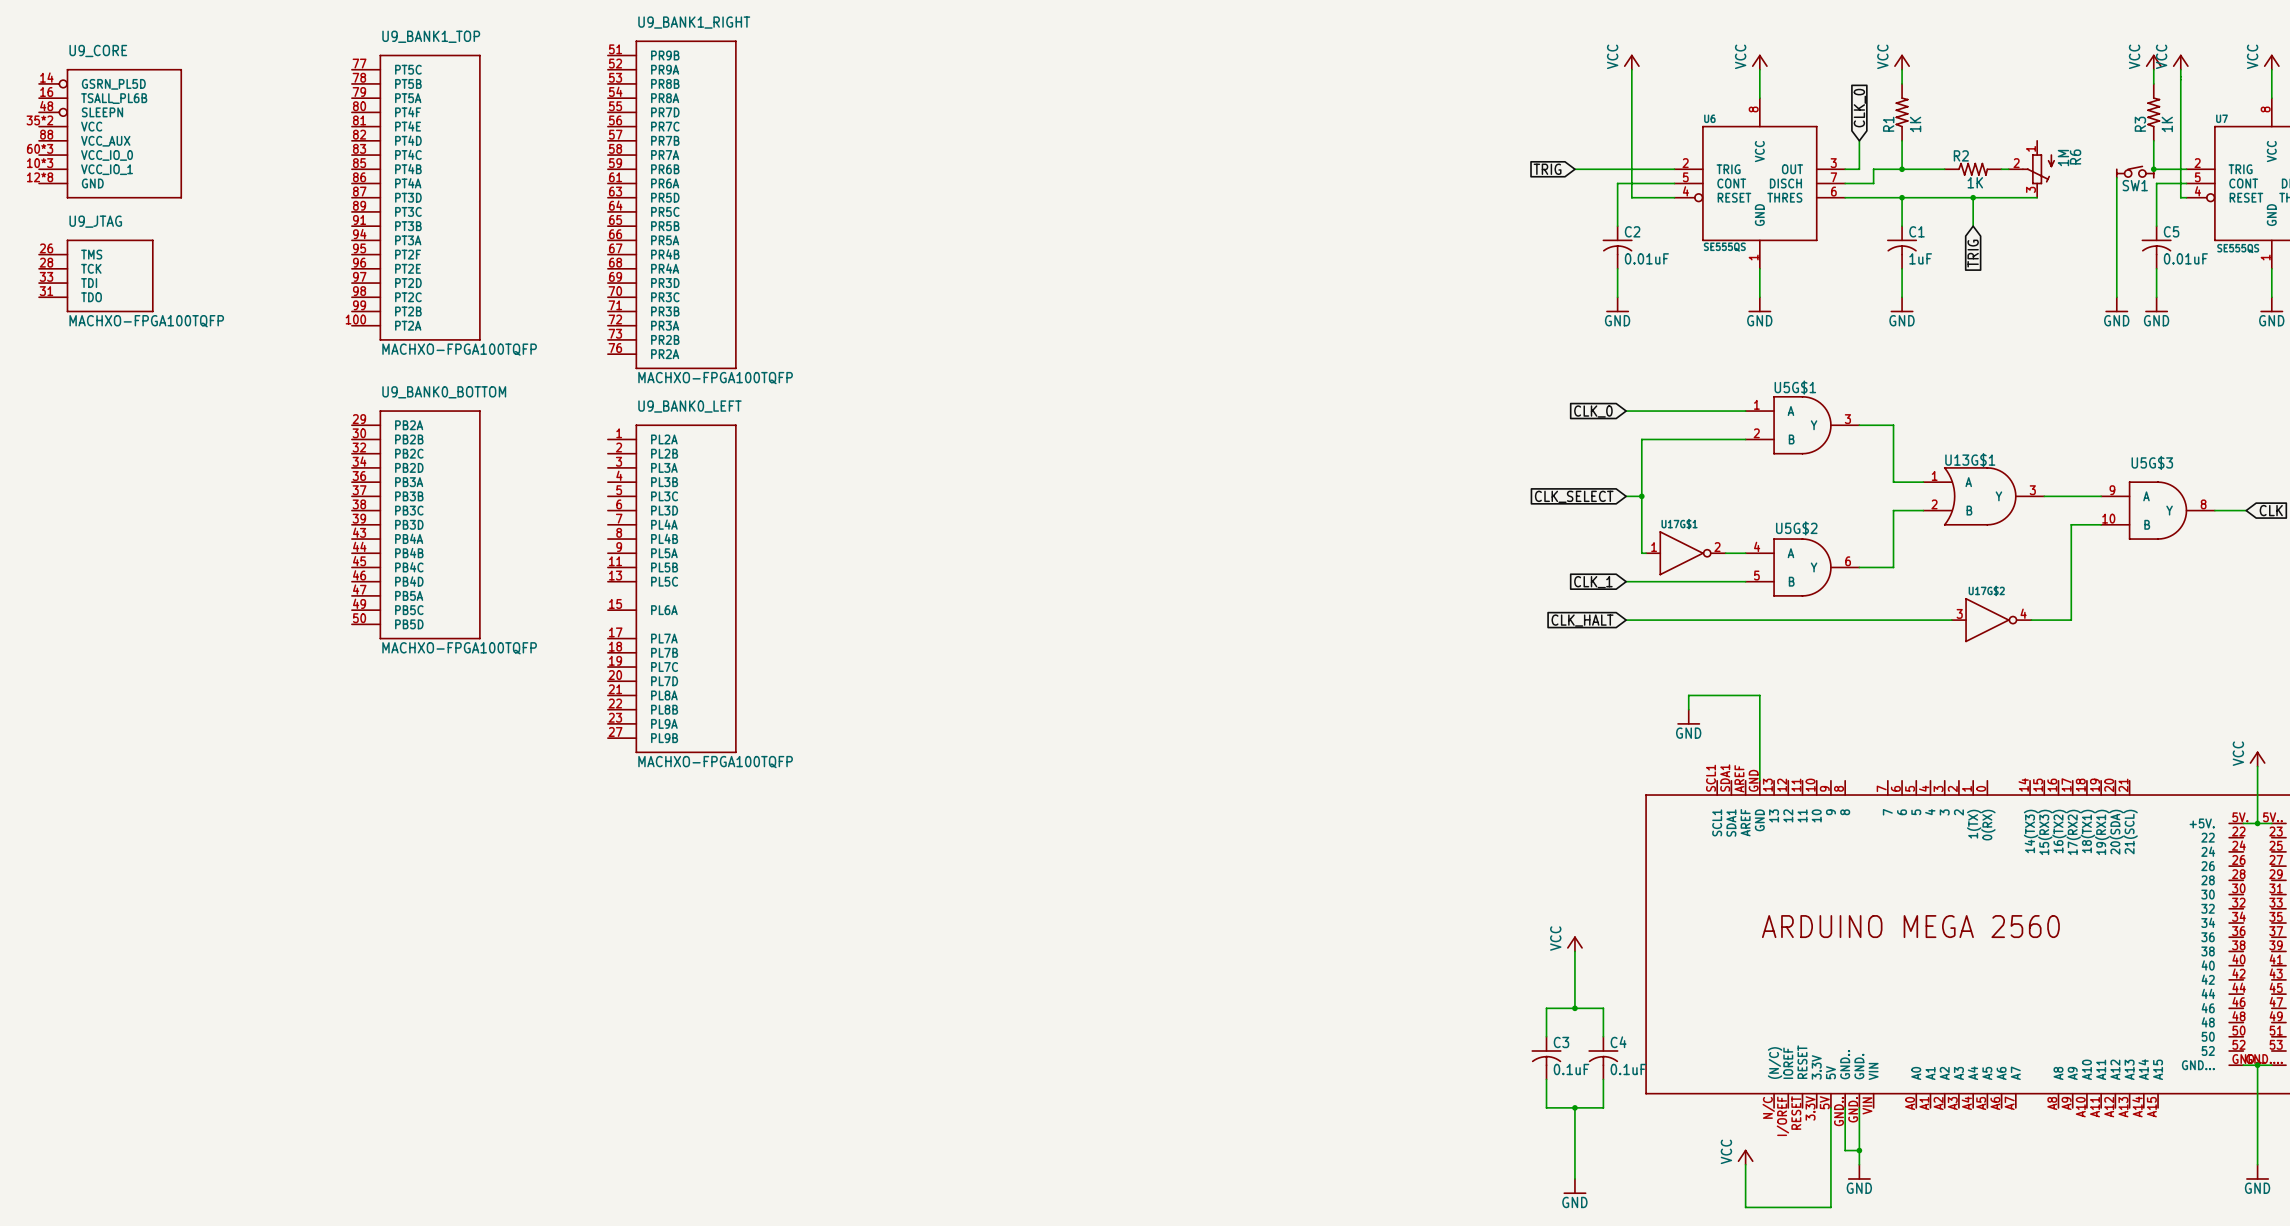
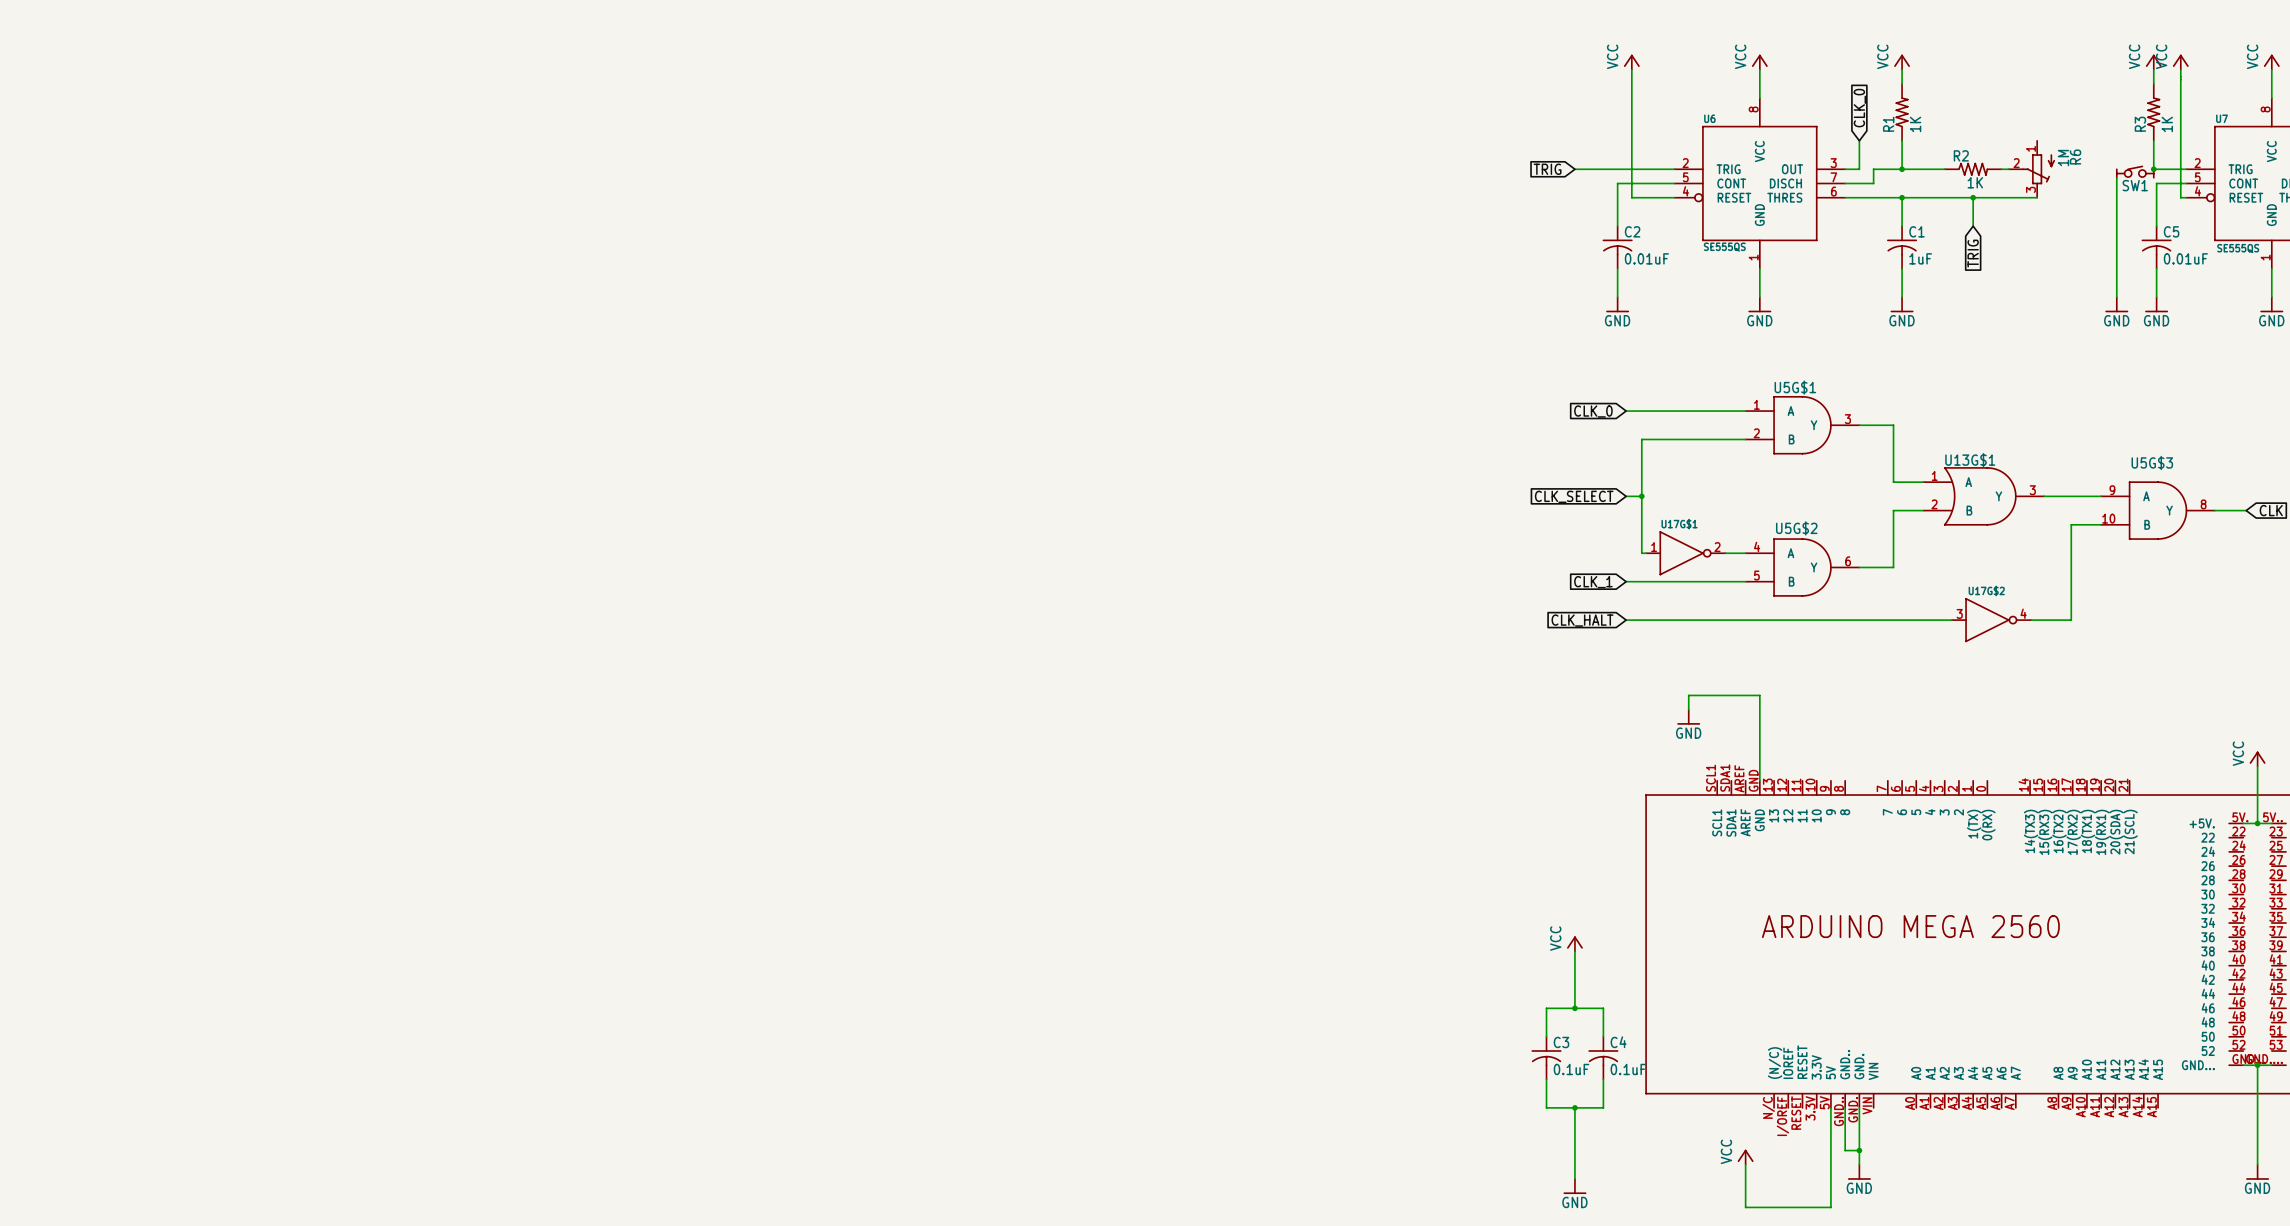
U9_CORE: (110, 133) -> none
U9_BANK1_TOP: MACHXO-FPGA100TQFP (416, 197) -> none
U9_BANK1_RIGHT: MACHXO-FPGA100TQFP (672, 204) -> none
U9_JTAG: MACHXO-FPGA100TQFP (96, 275) -> none
U9_BANK0_BOTTOM: MACHXO-FPGA100TQFP (416, 524) -> none
U9_BANK0_LEFT: MACHXO-FPGA100TQFP (672, 588) -> none

